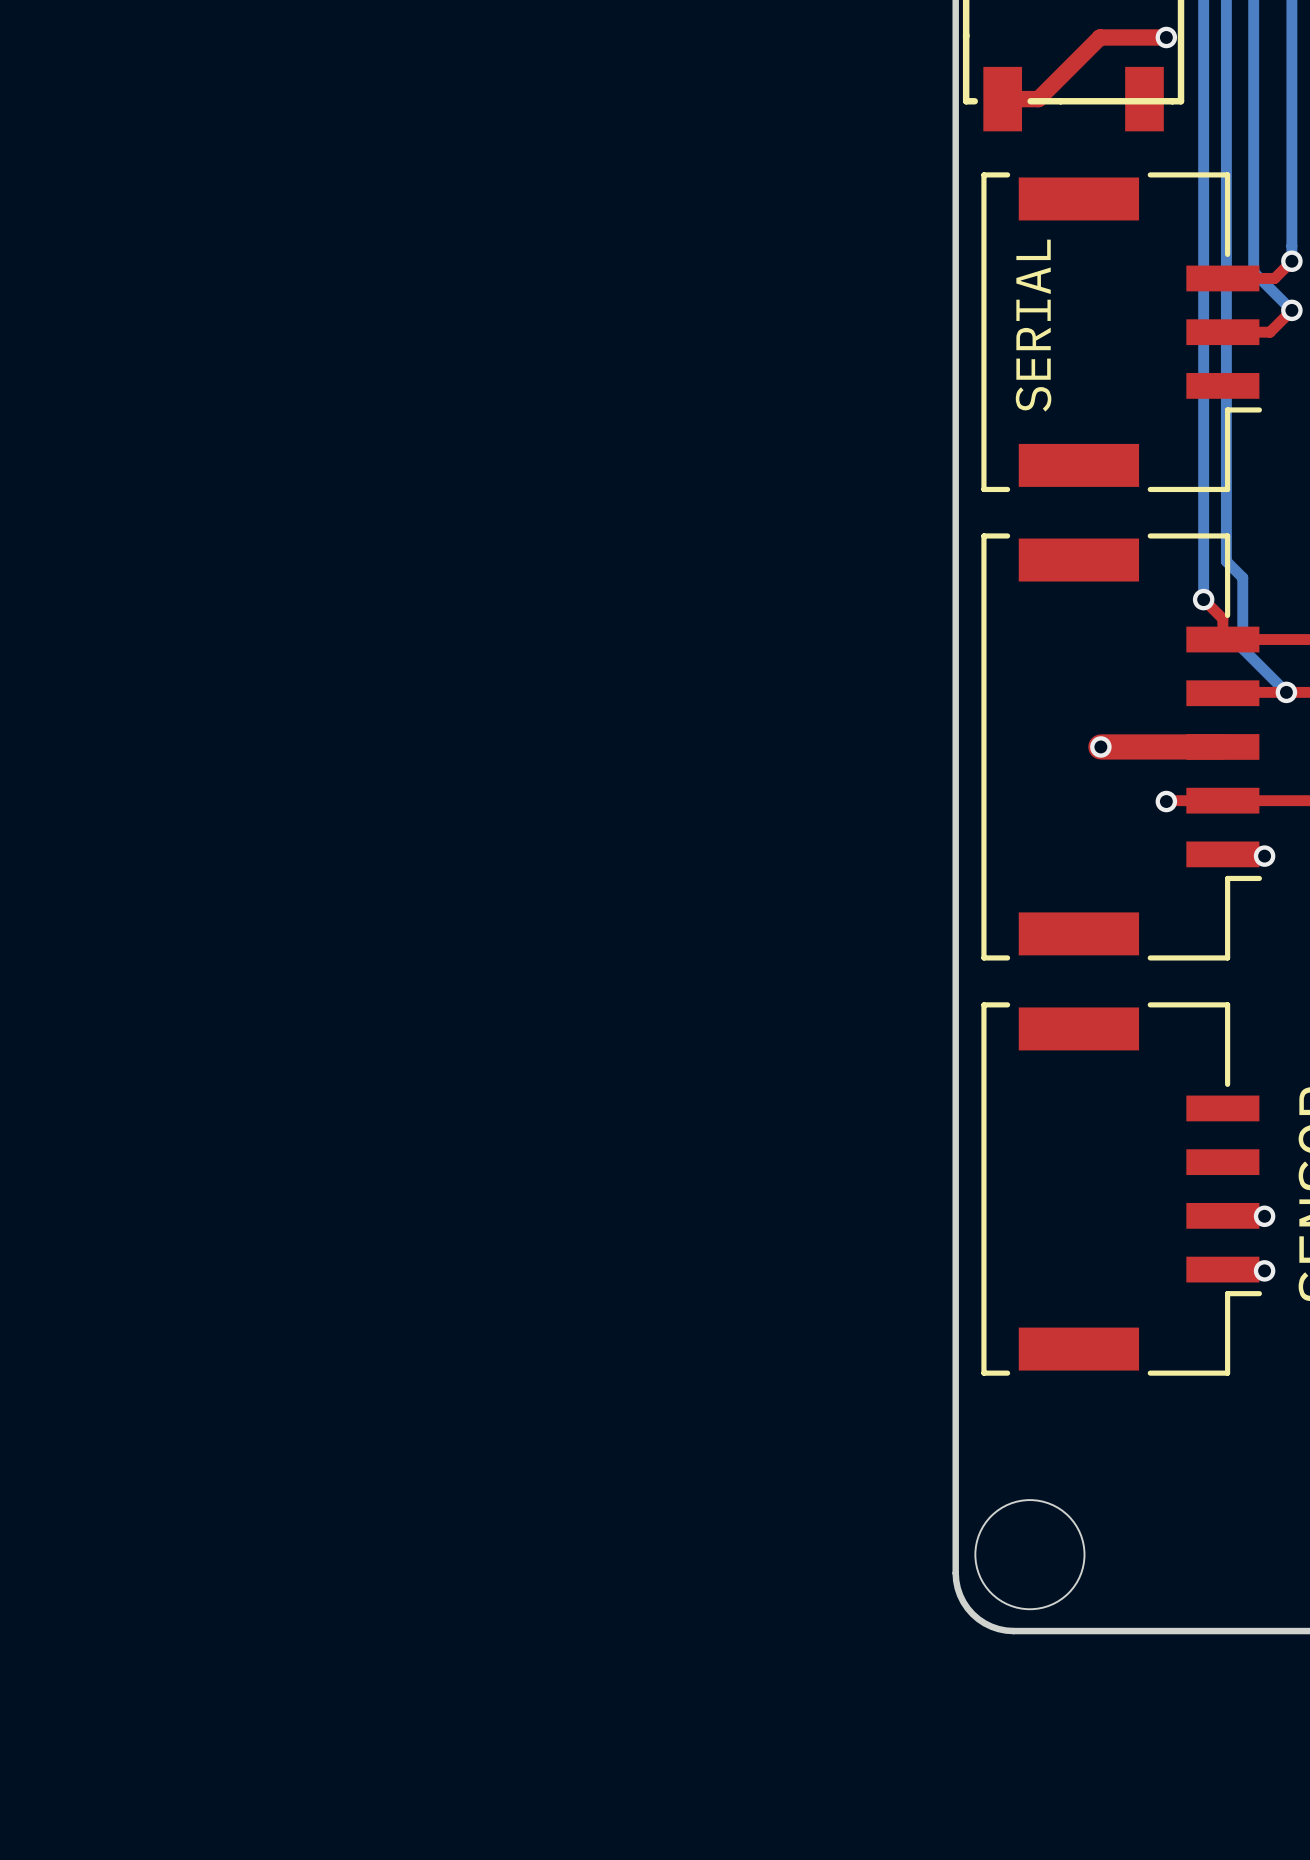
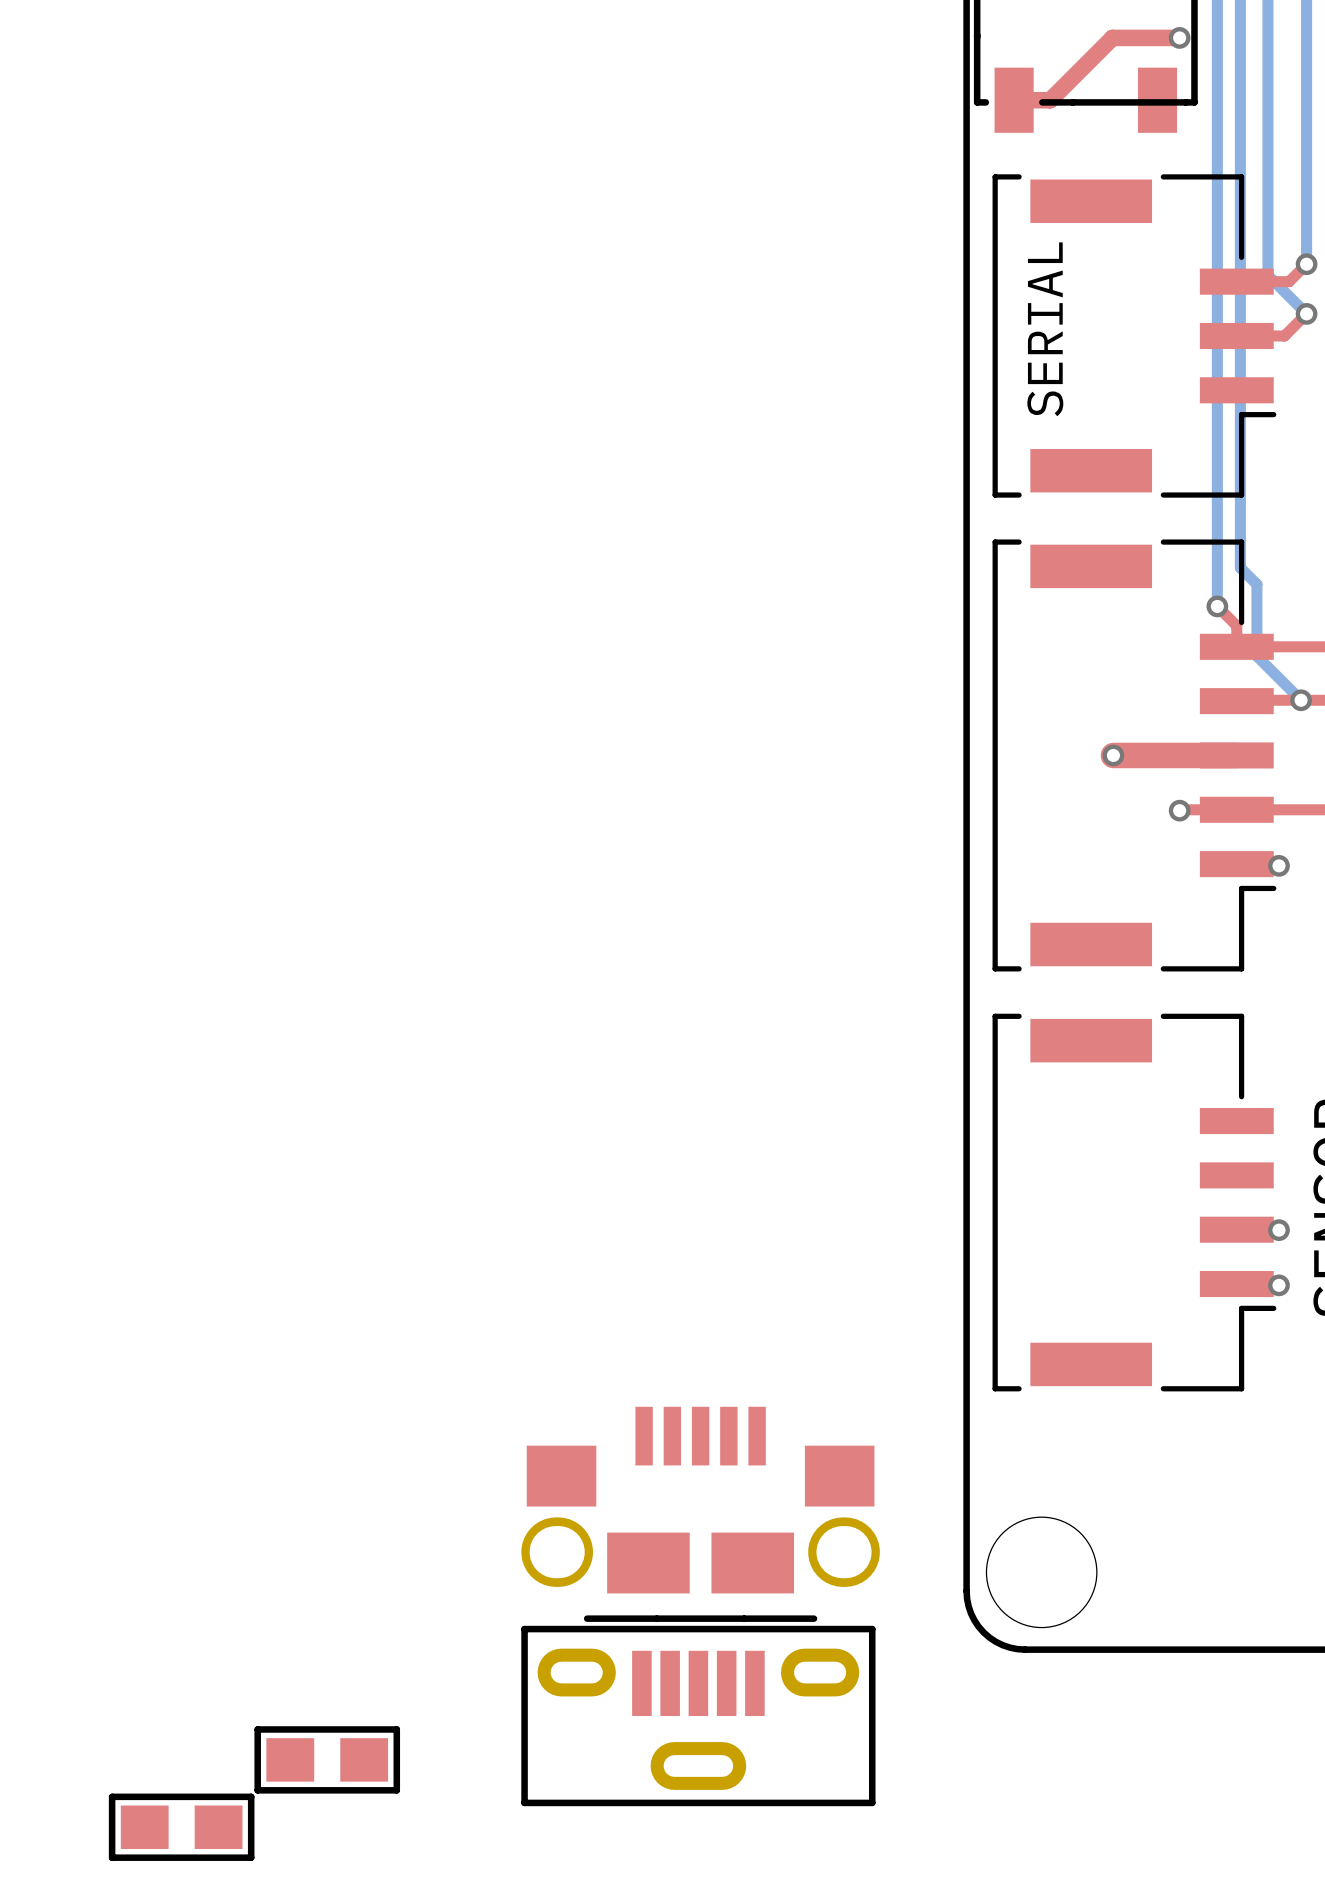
part: none -> (700, 1514)
part: none -> (698, 1716)
part: none -> (327, 1759)
part: none -> (181, 1827)

